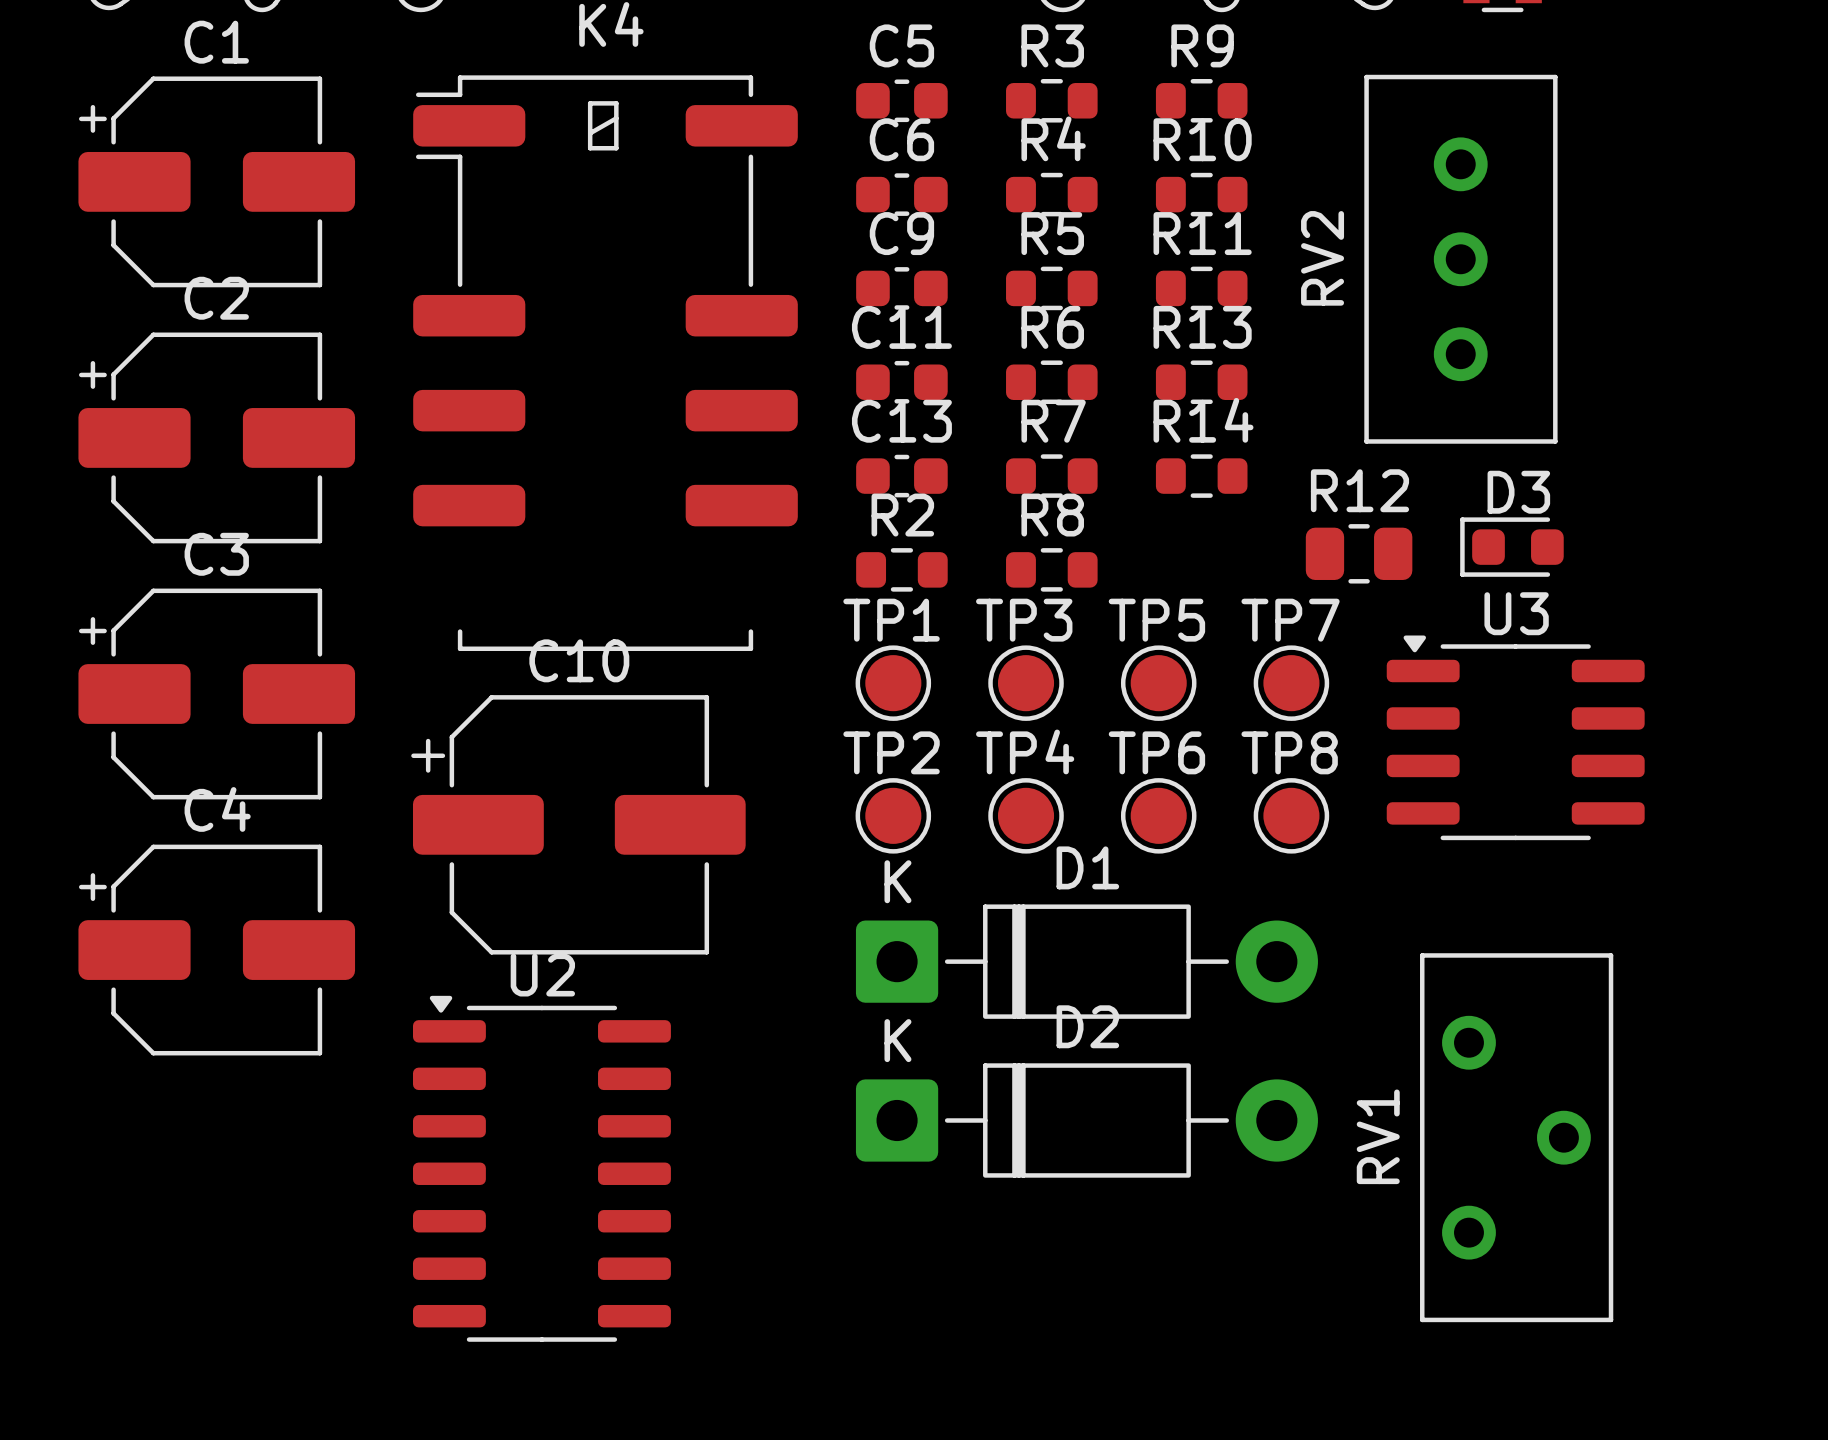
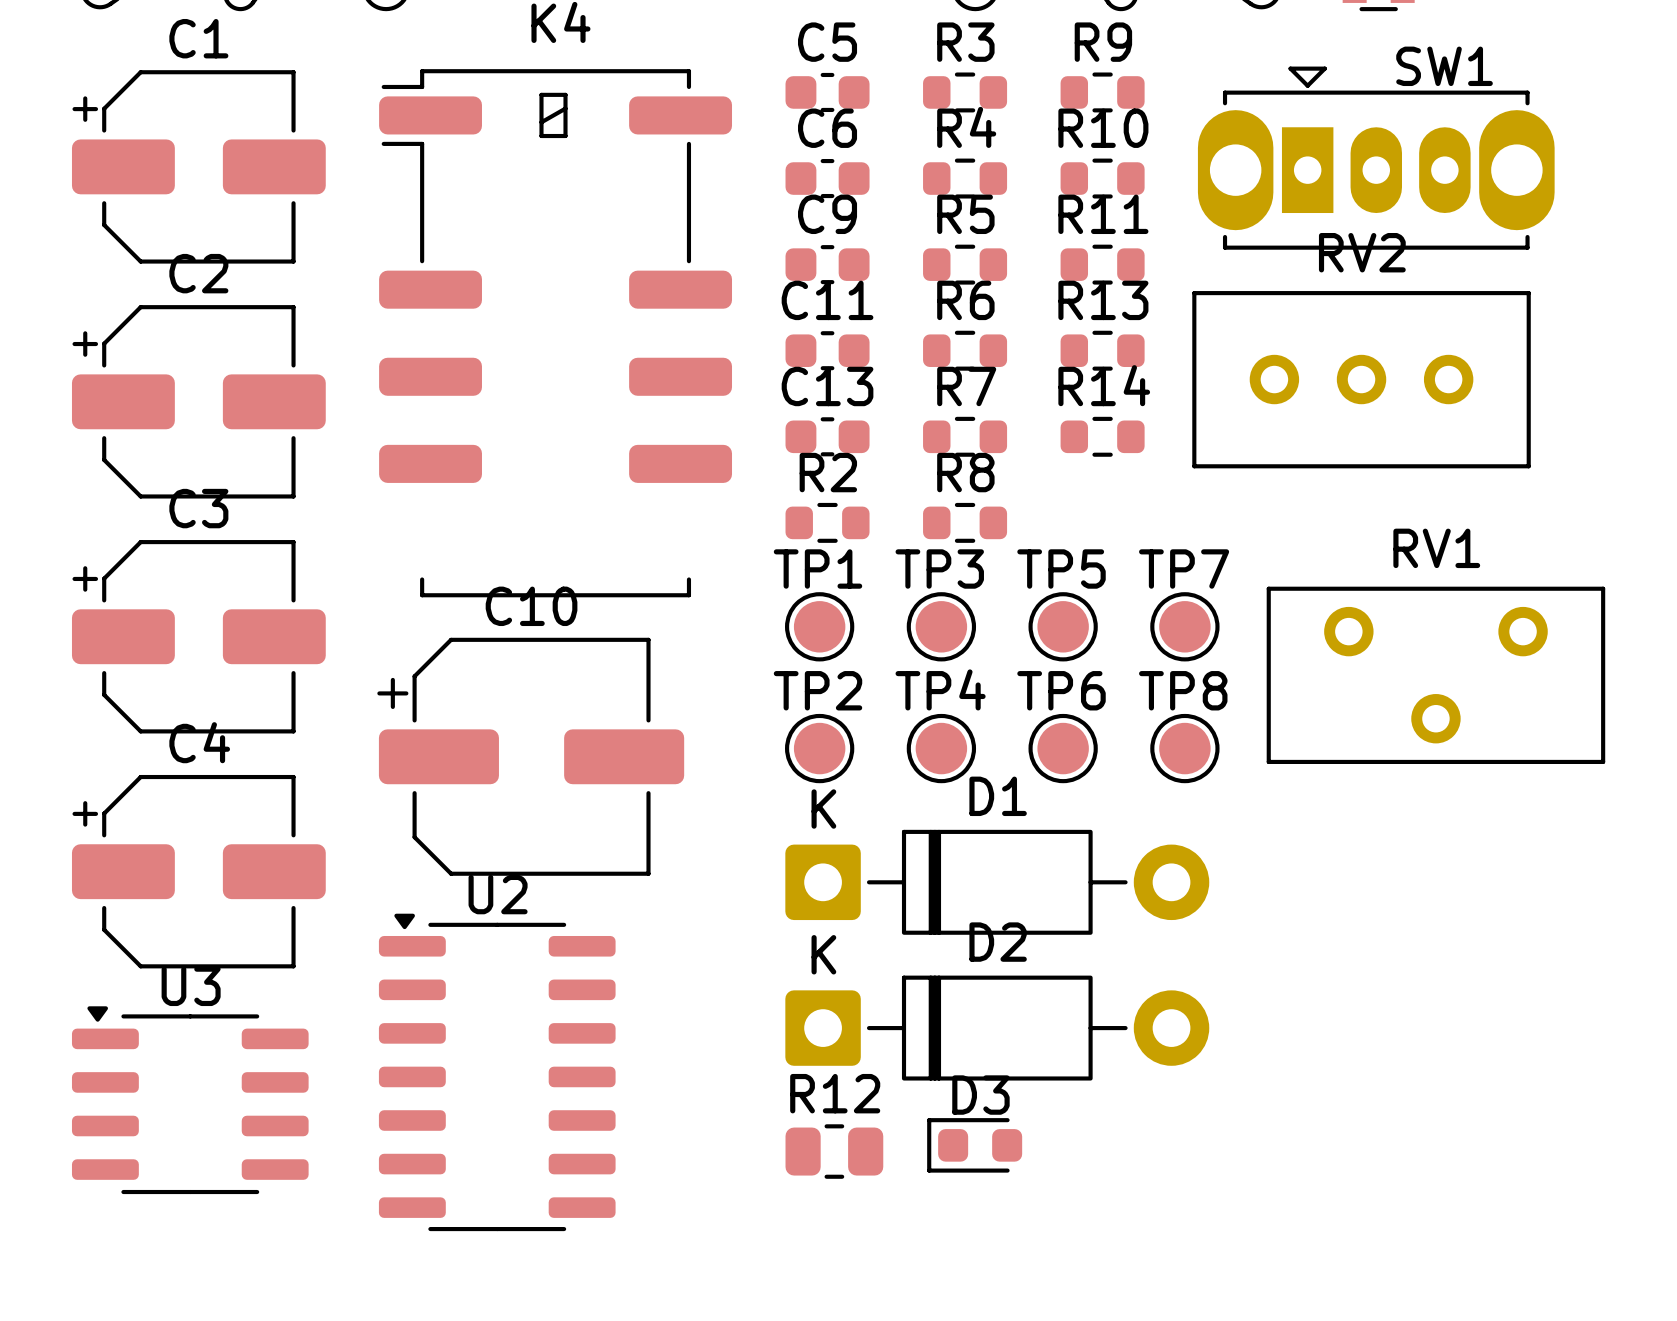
SW1: none -> (1376, 158)
RV2 rotation: 0° (1460, 259) -> 90° clockwise (1361, 379)
D3 position: (1511, 547) -> (974, 1145)
R12 position: (1359, 553) -> (834, 1151)
U3 position: (1515, 737) -> (190, 1100)
RV1 rotation: 0° (1516, 1137) -> 90° clockwise (1435, 675)
RV1 position: (1516, 1137) -> (1435, 675)

